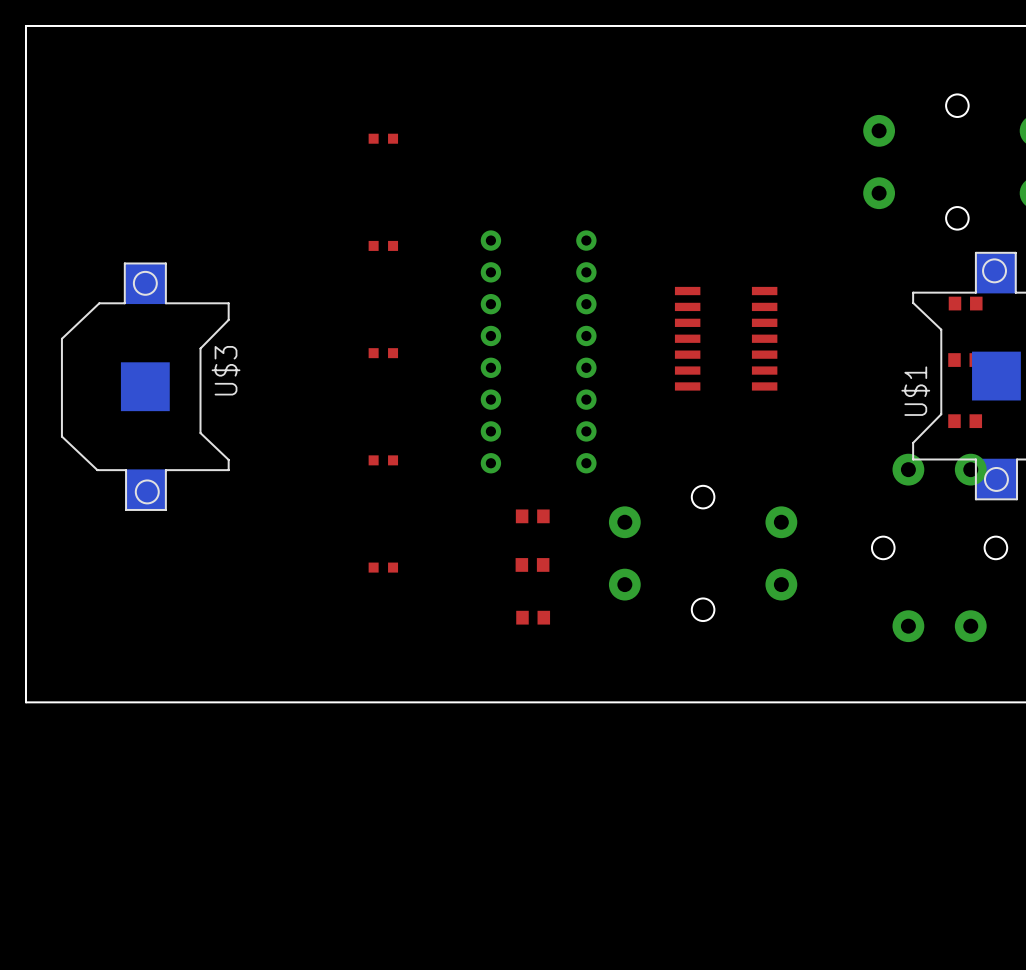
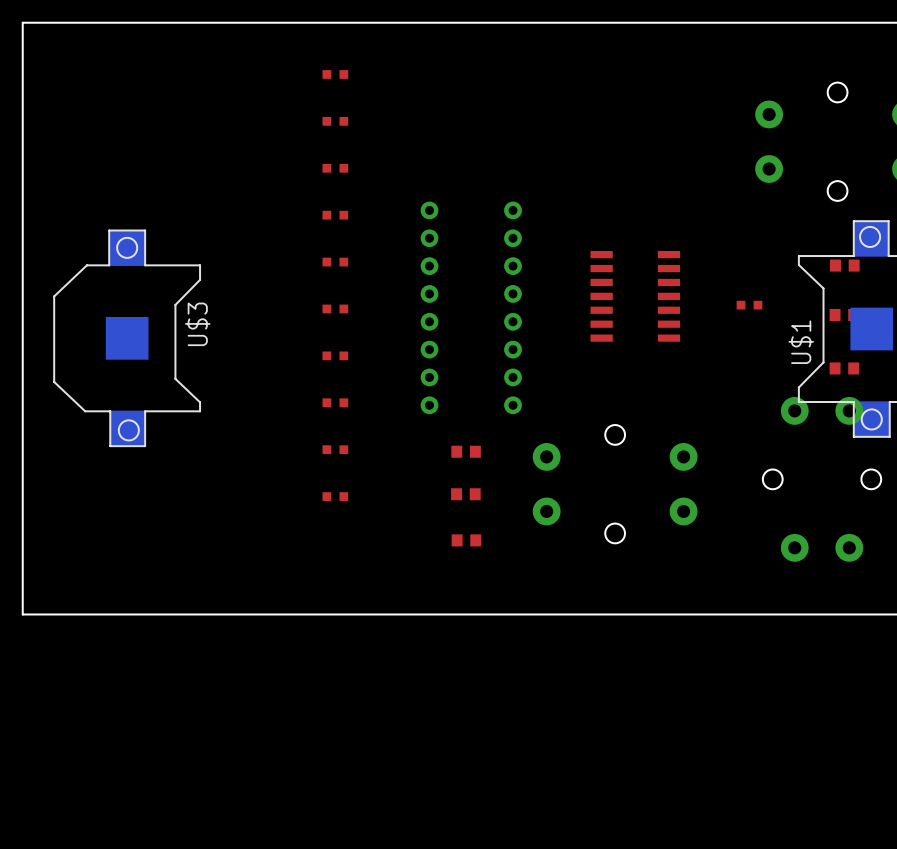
part: none -> (335, 74)
part: none -> (335, 168)
part: none -> (335, 262)
part: none -> (749, 305)
part: none -> (335, 355)
part: none -> (335, 449)

